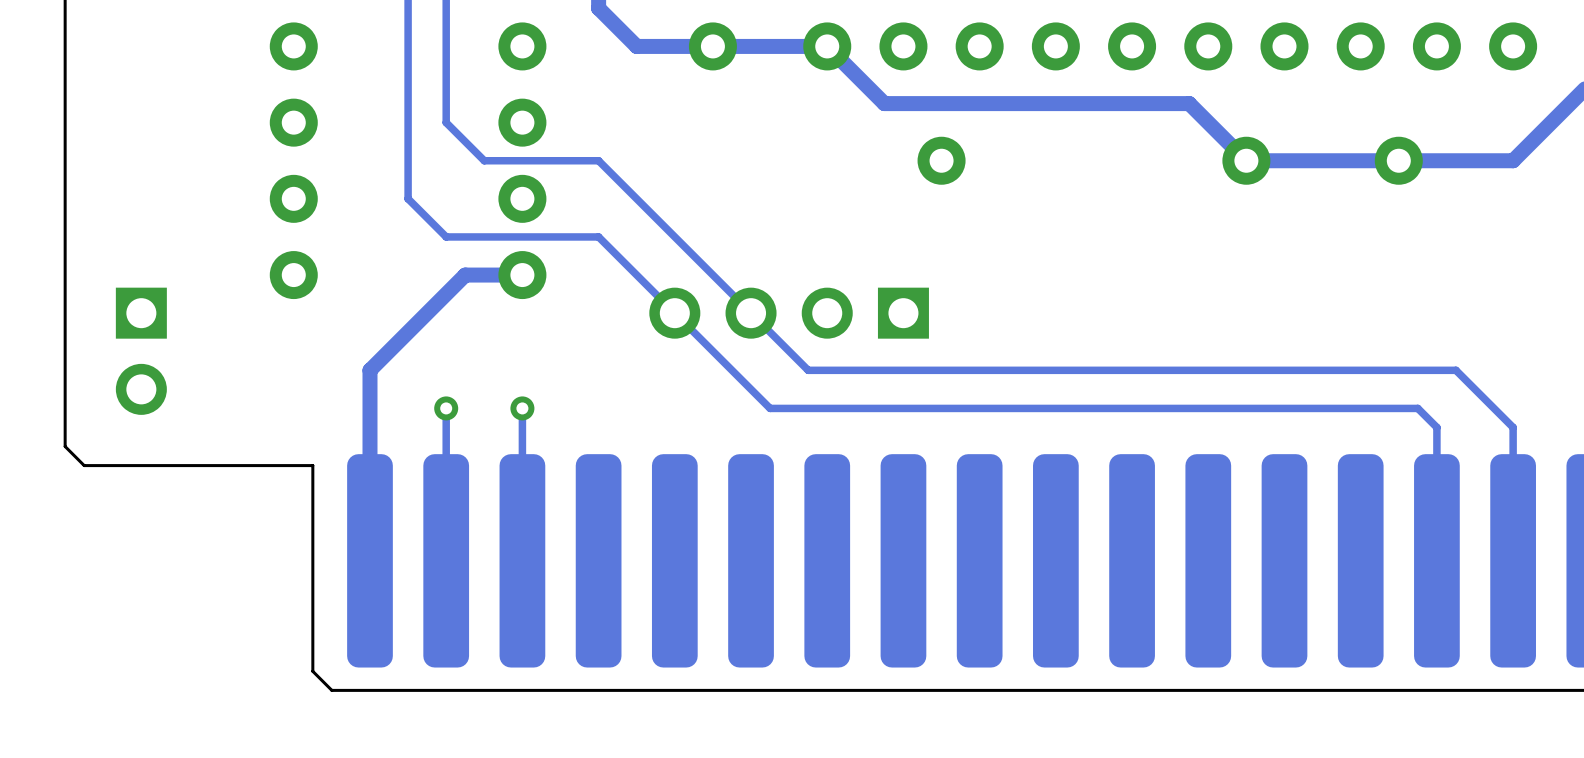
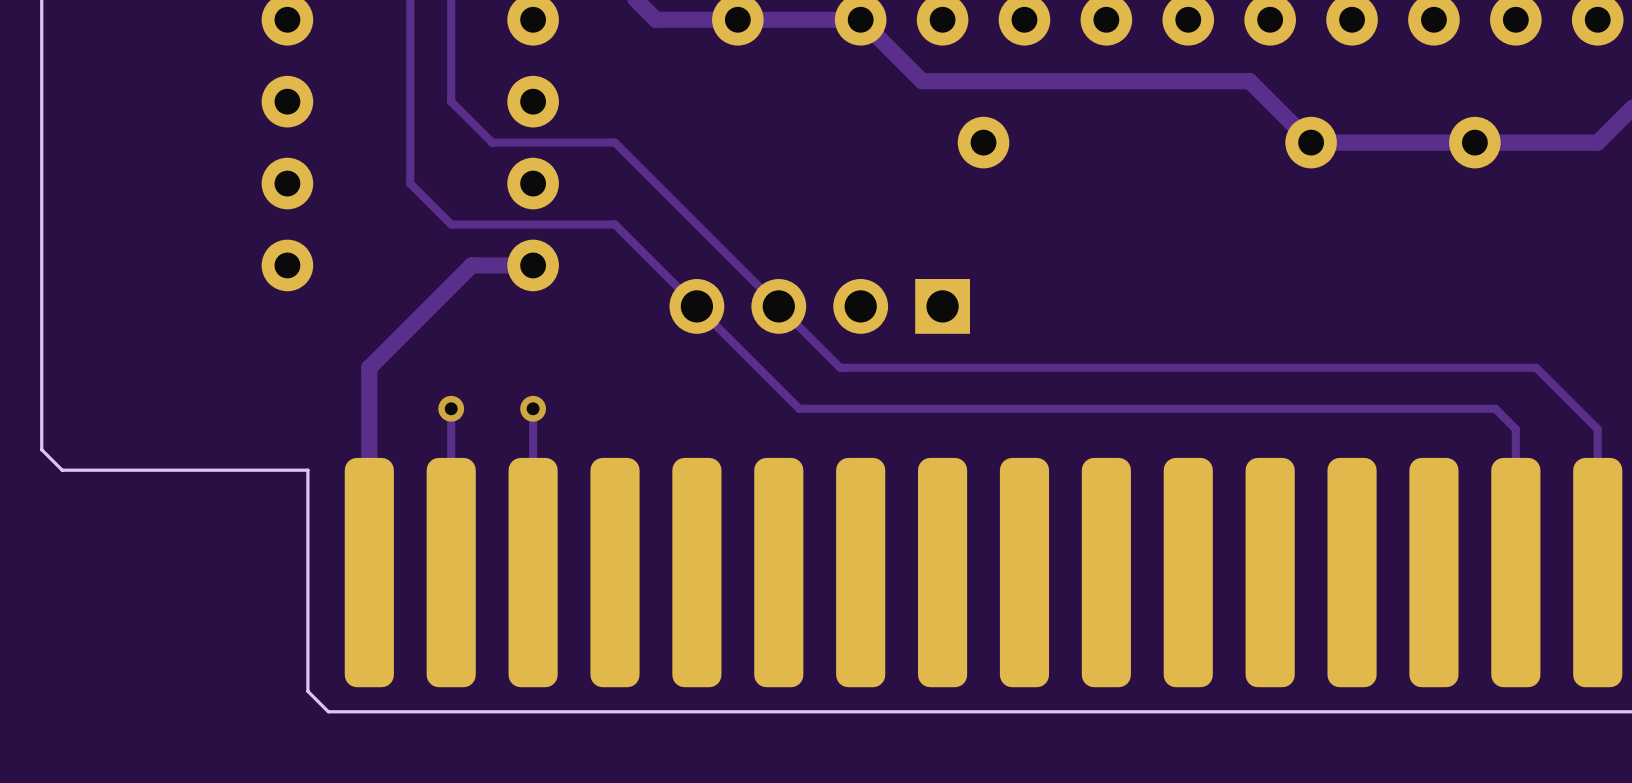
part: (141, 351) -> none

